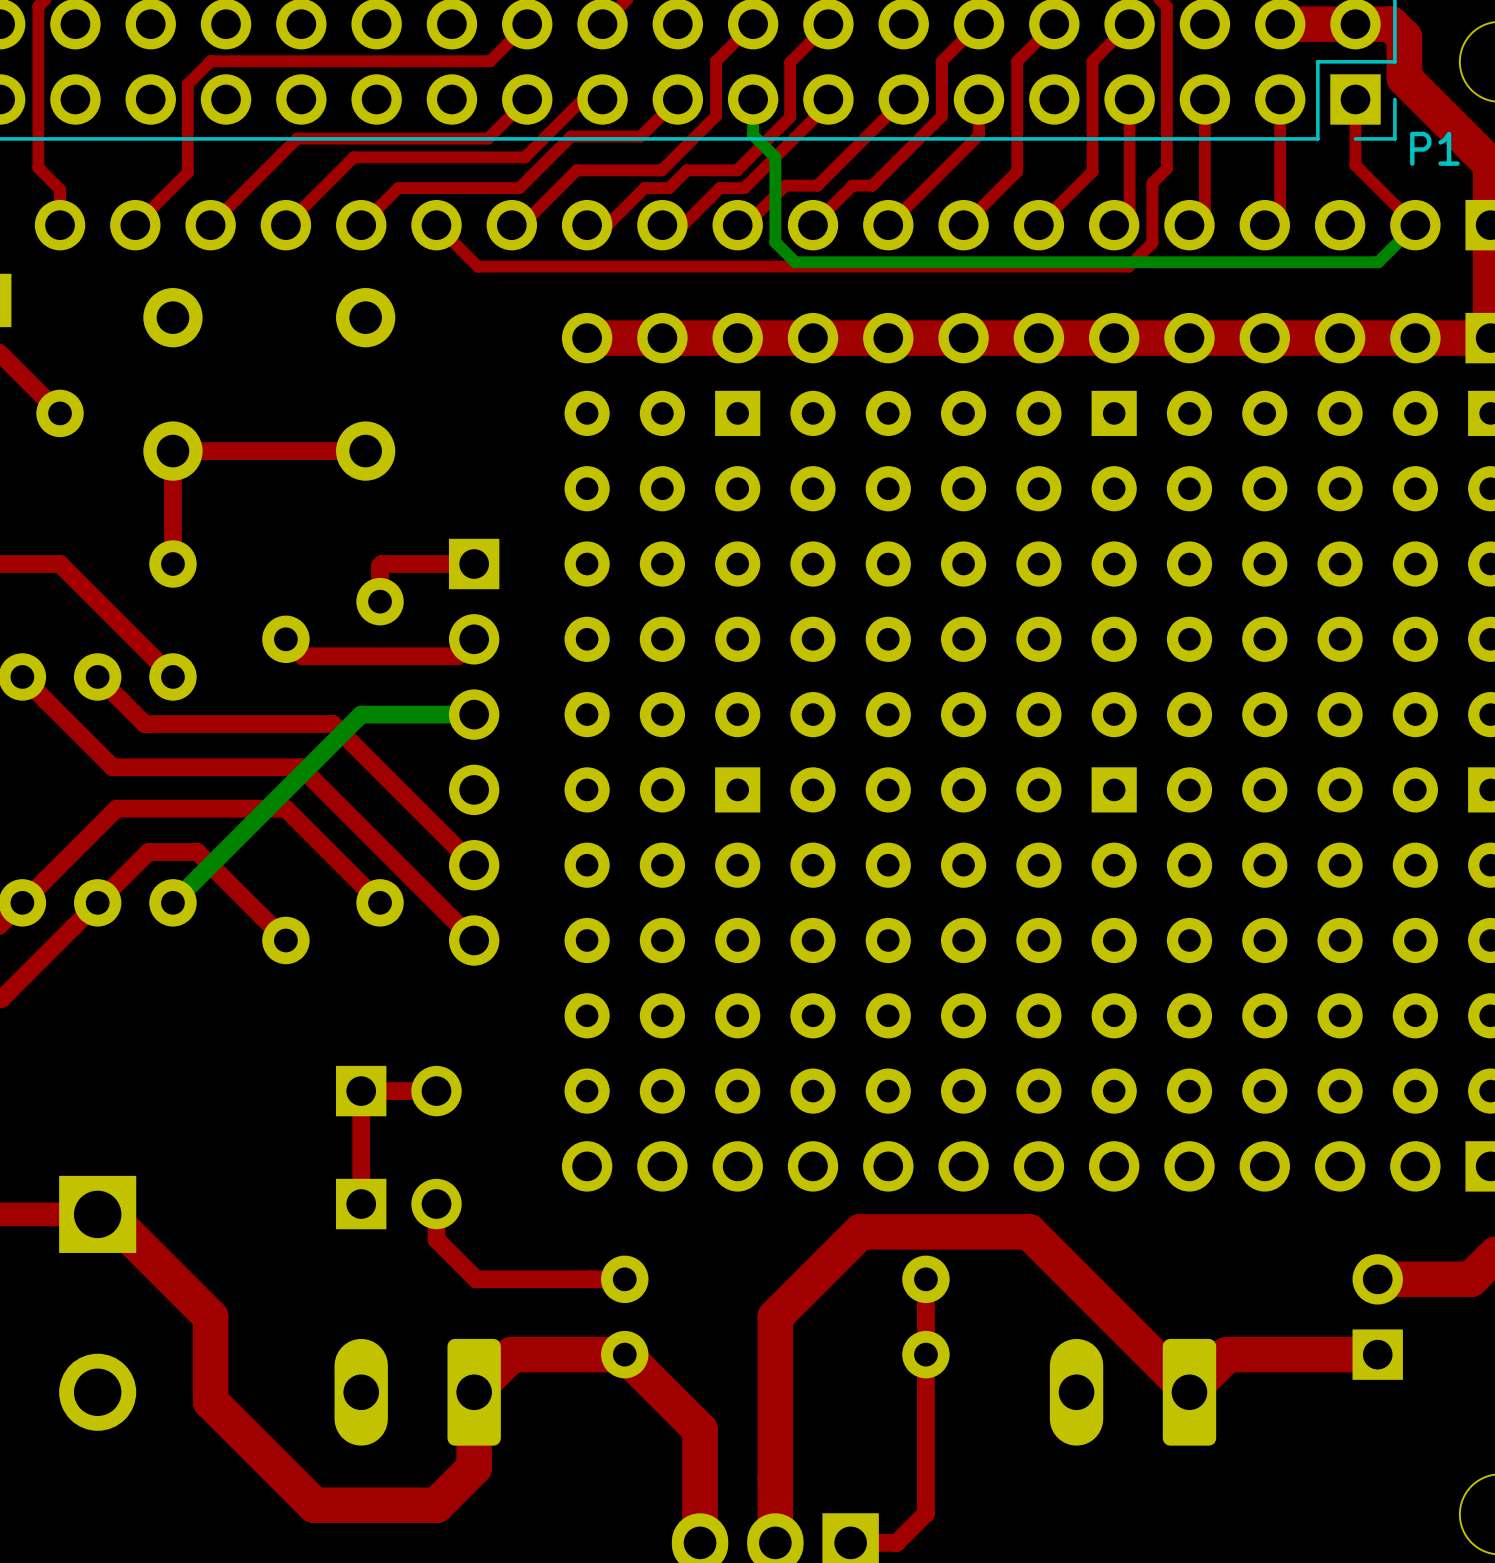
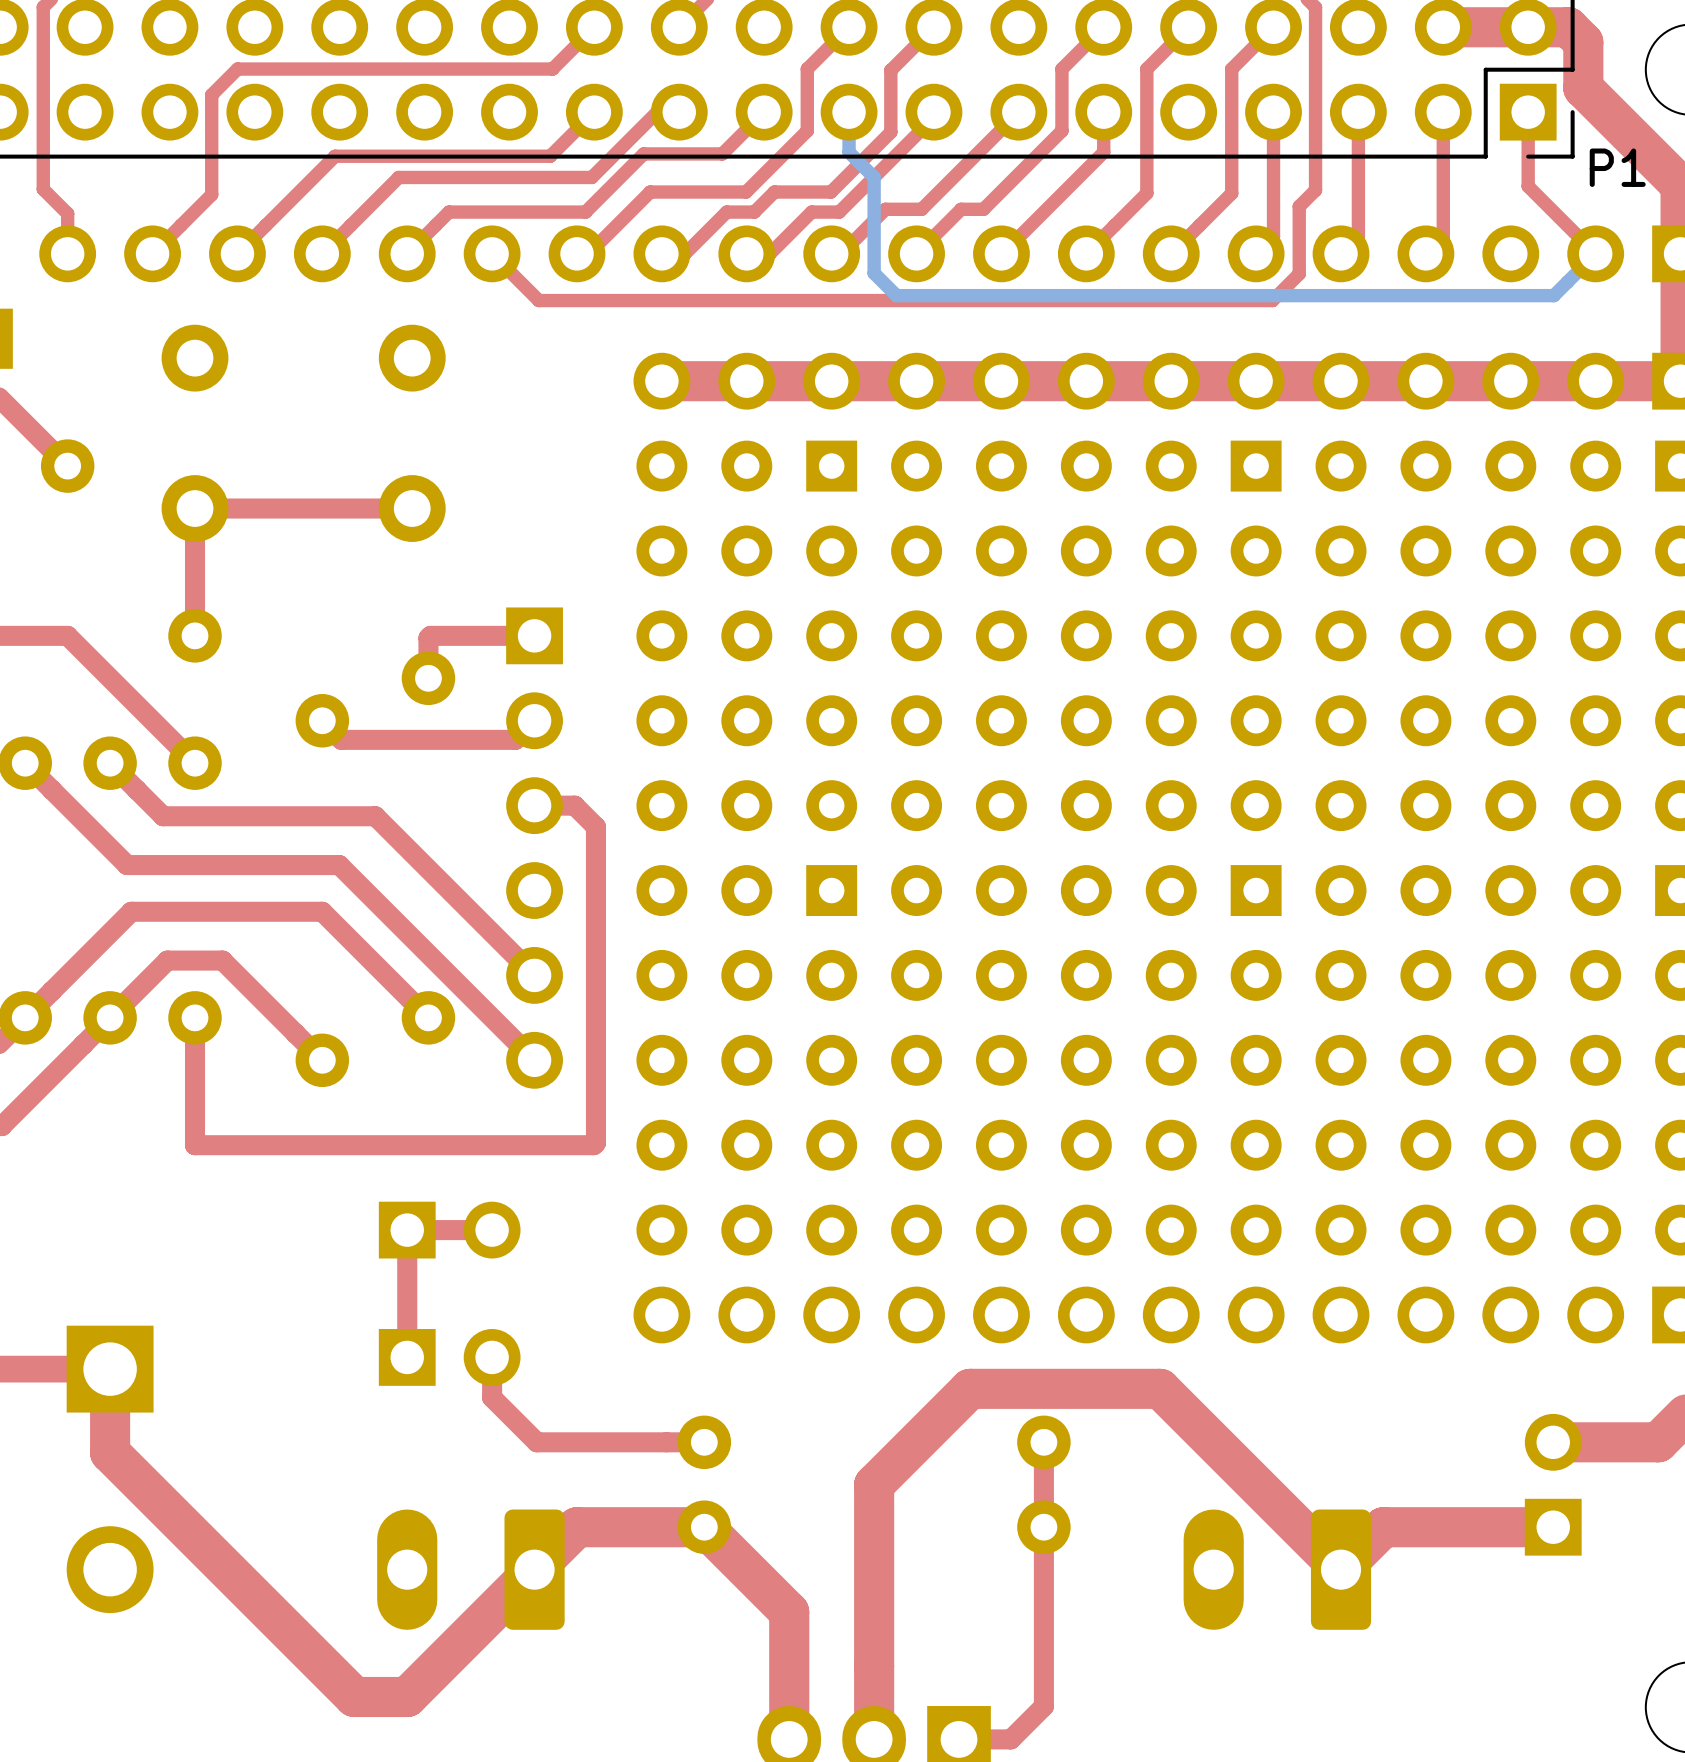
top track: none -> (534, 805) (574, 805) (595, 826) (595, 1142) (593, 1145) (195, 1145) (195, 1017)
bottom track: (474, 714) (361, 714) (172, 902) -> none
top track: (97, 1214) (108, 1214) (210, 1316) (210, 1401) -> (110, 1369) (110, 1452) (237, 1580)
top track: (474, 1392) (474, 1467) (436, 1505) (361, 1505) -> (534, 1569) (407, 1696)

